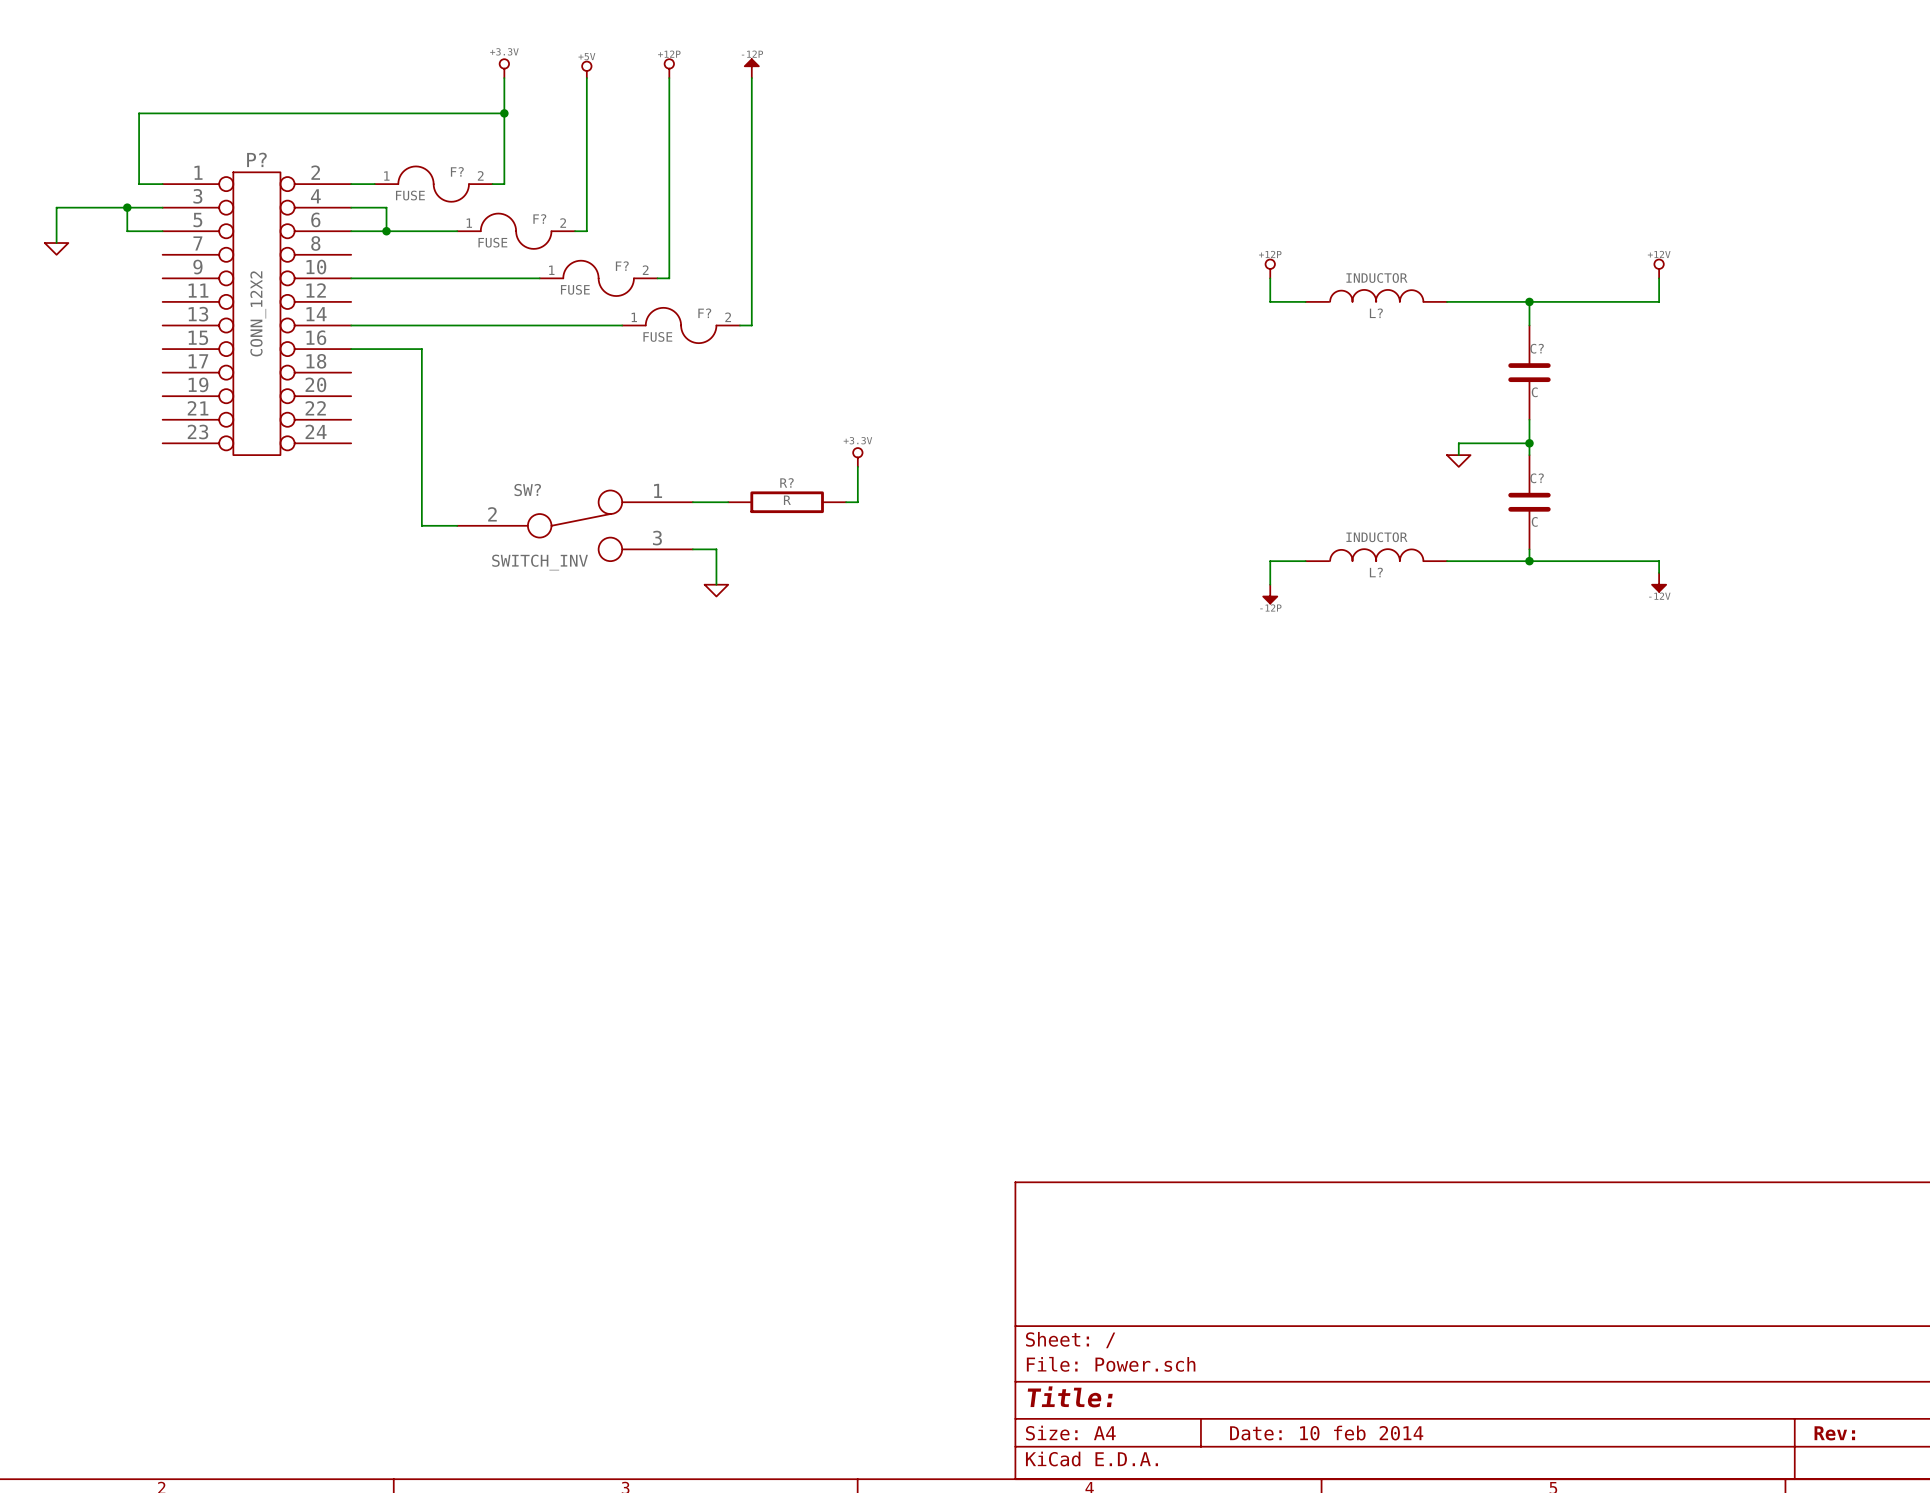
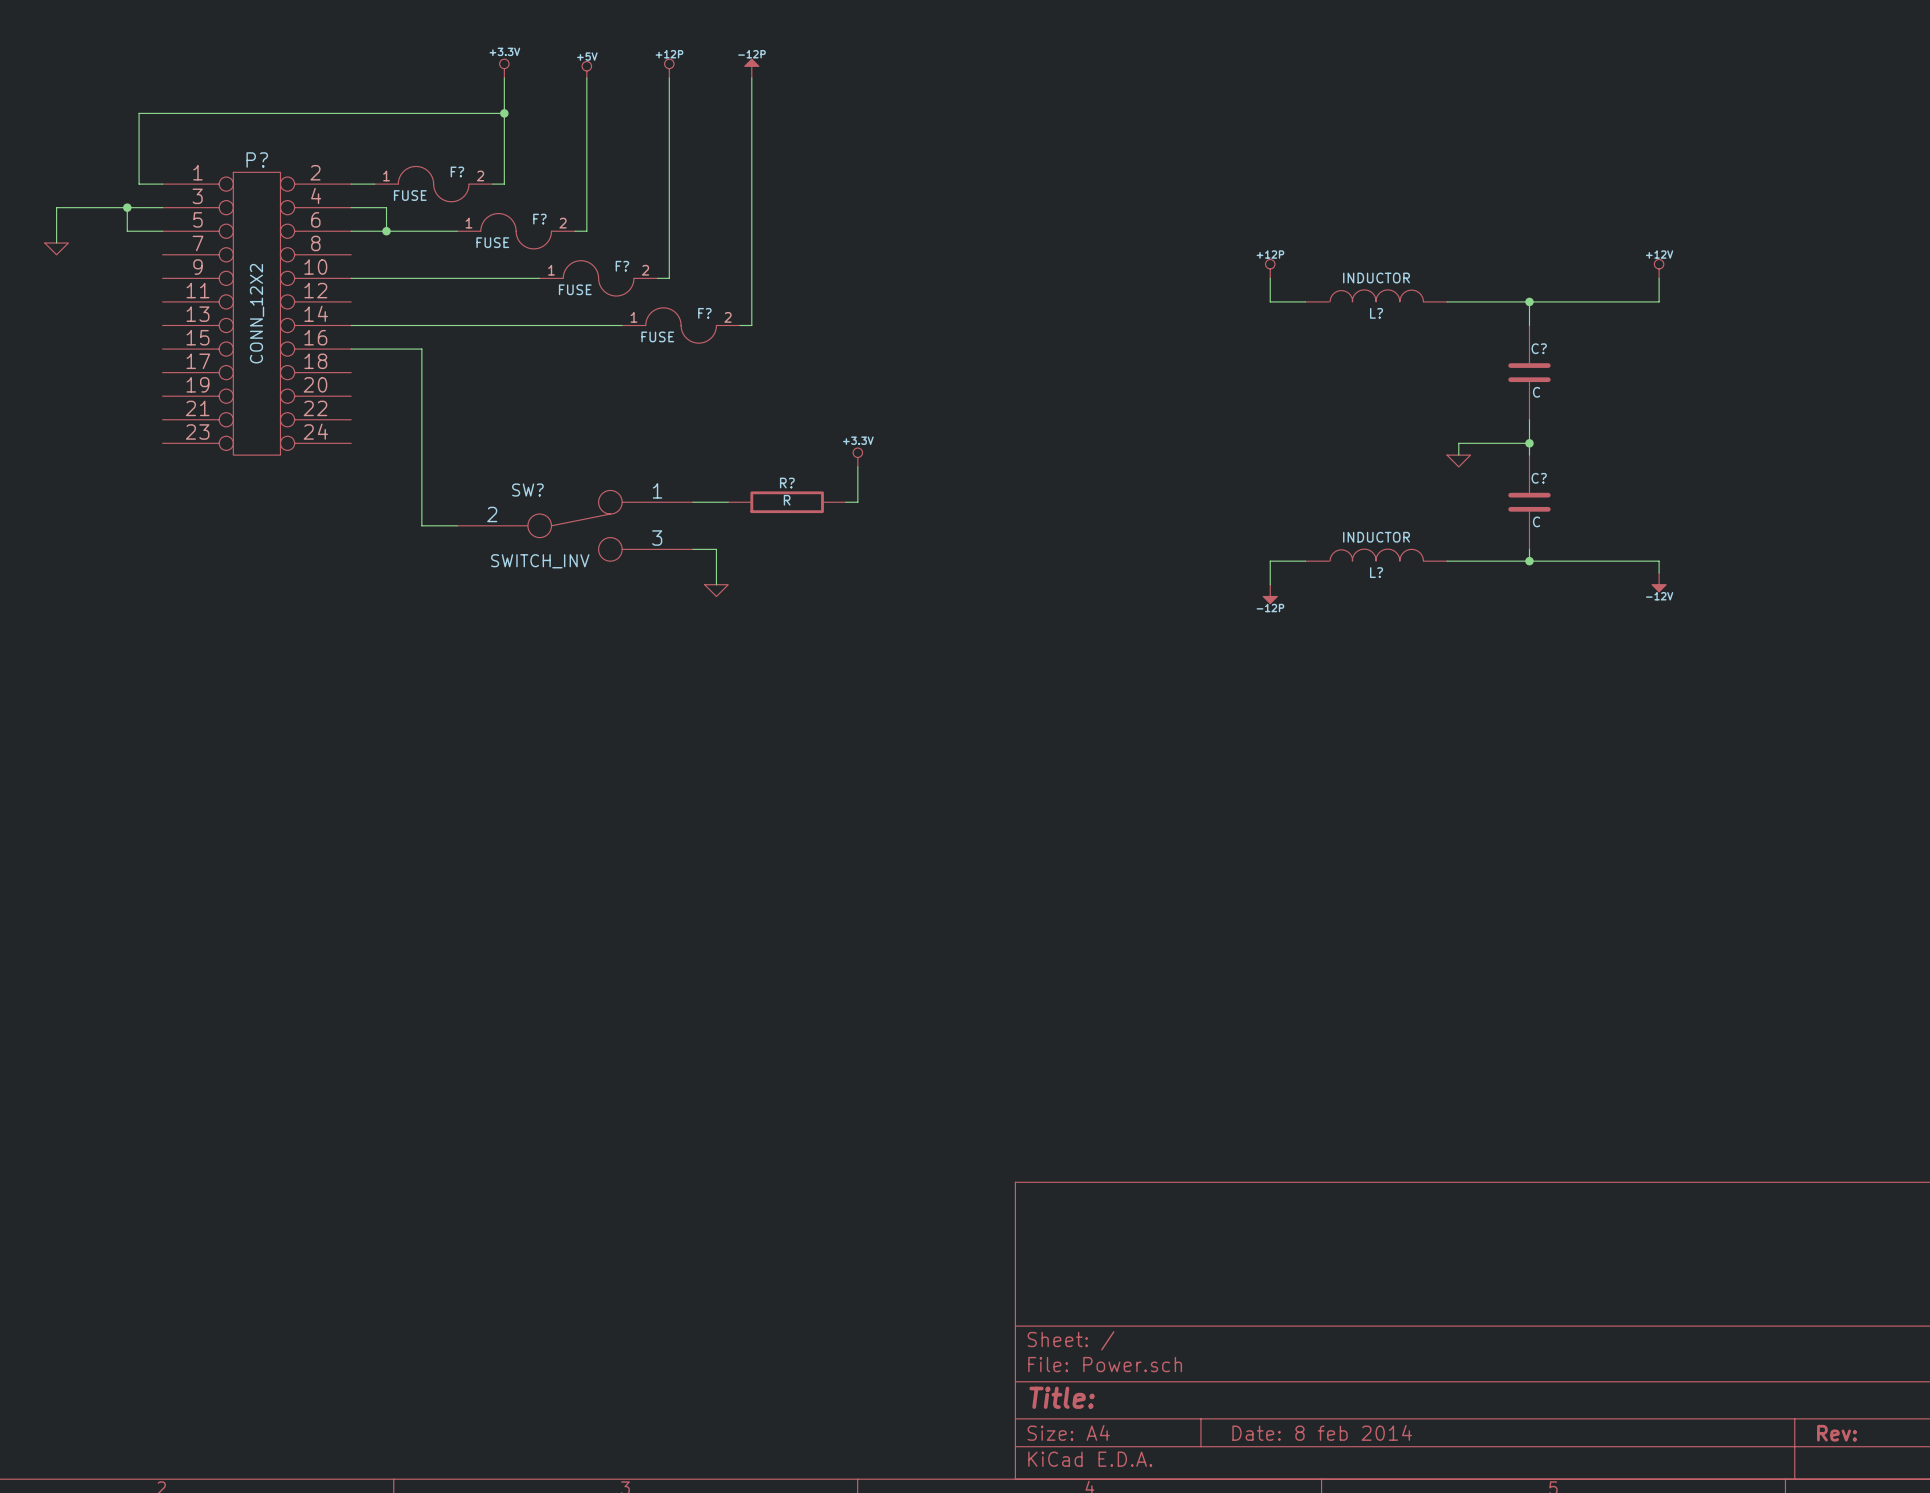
title block: Date: 10 feb 2014 (1326, 1433) -> Date: 8 feb 2014 (1322, 1432)

